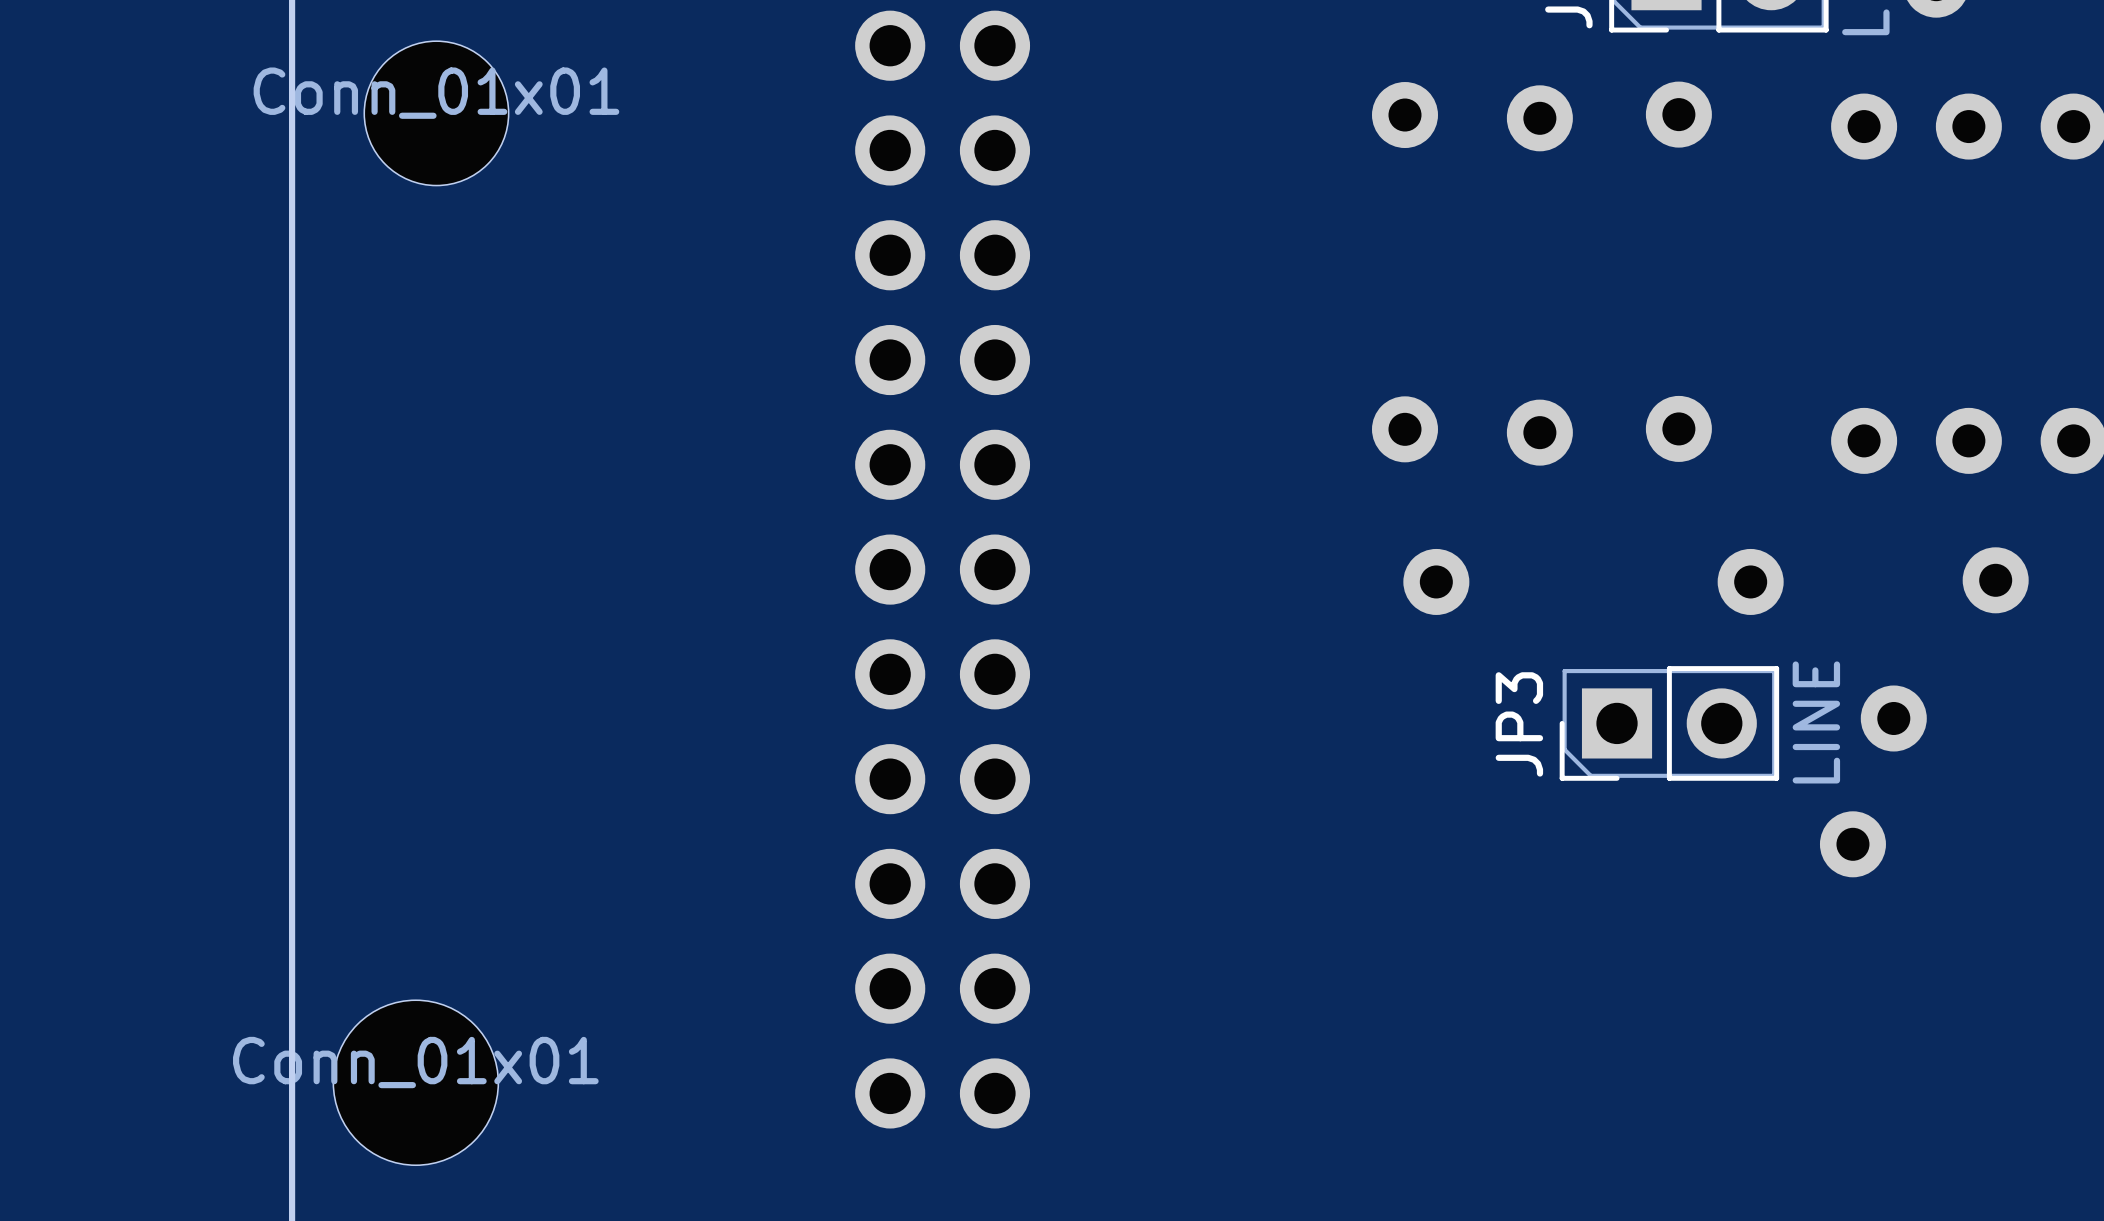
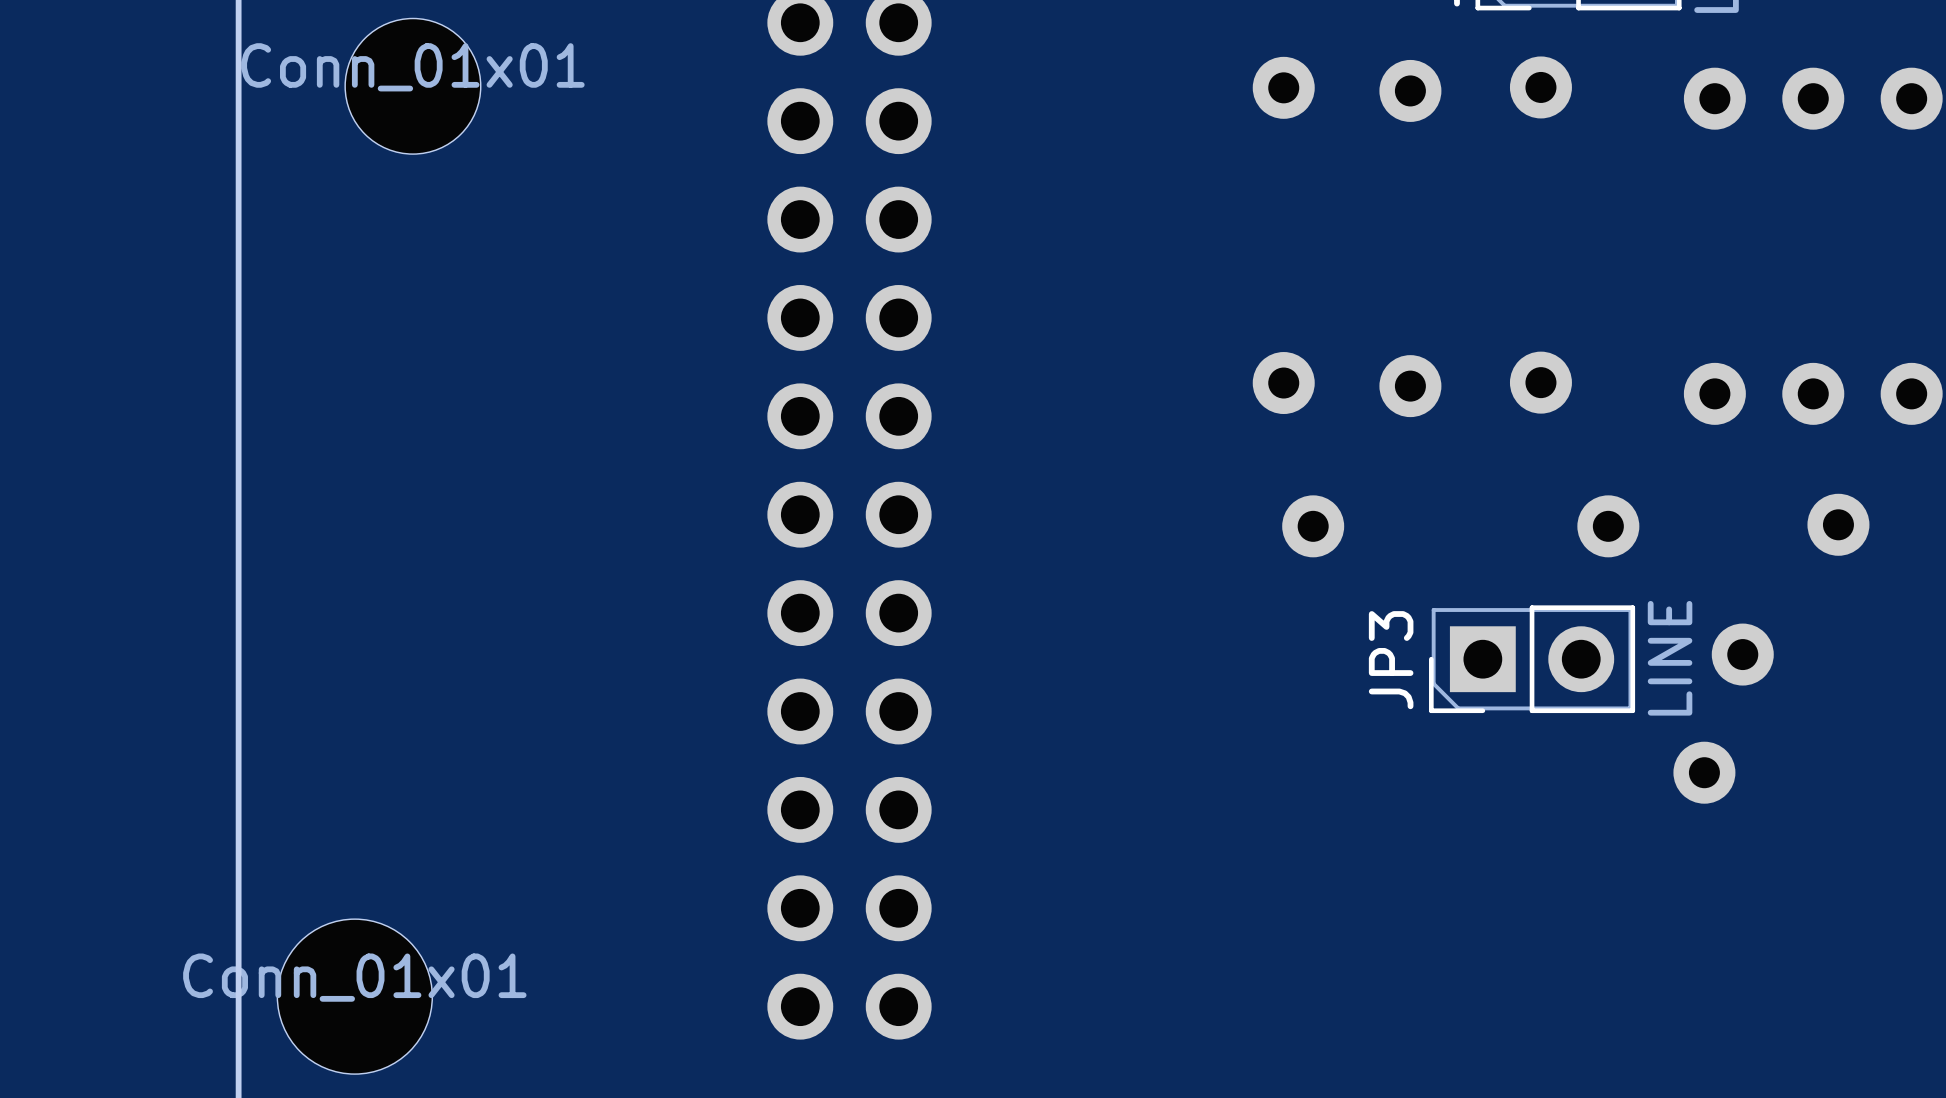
part position: (436, 113) -> (412, 86)

